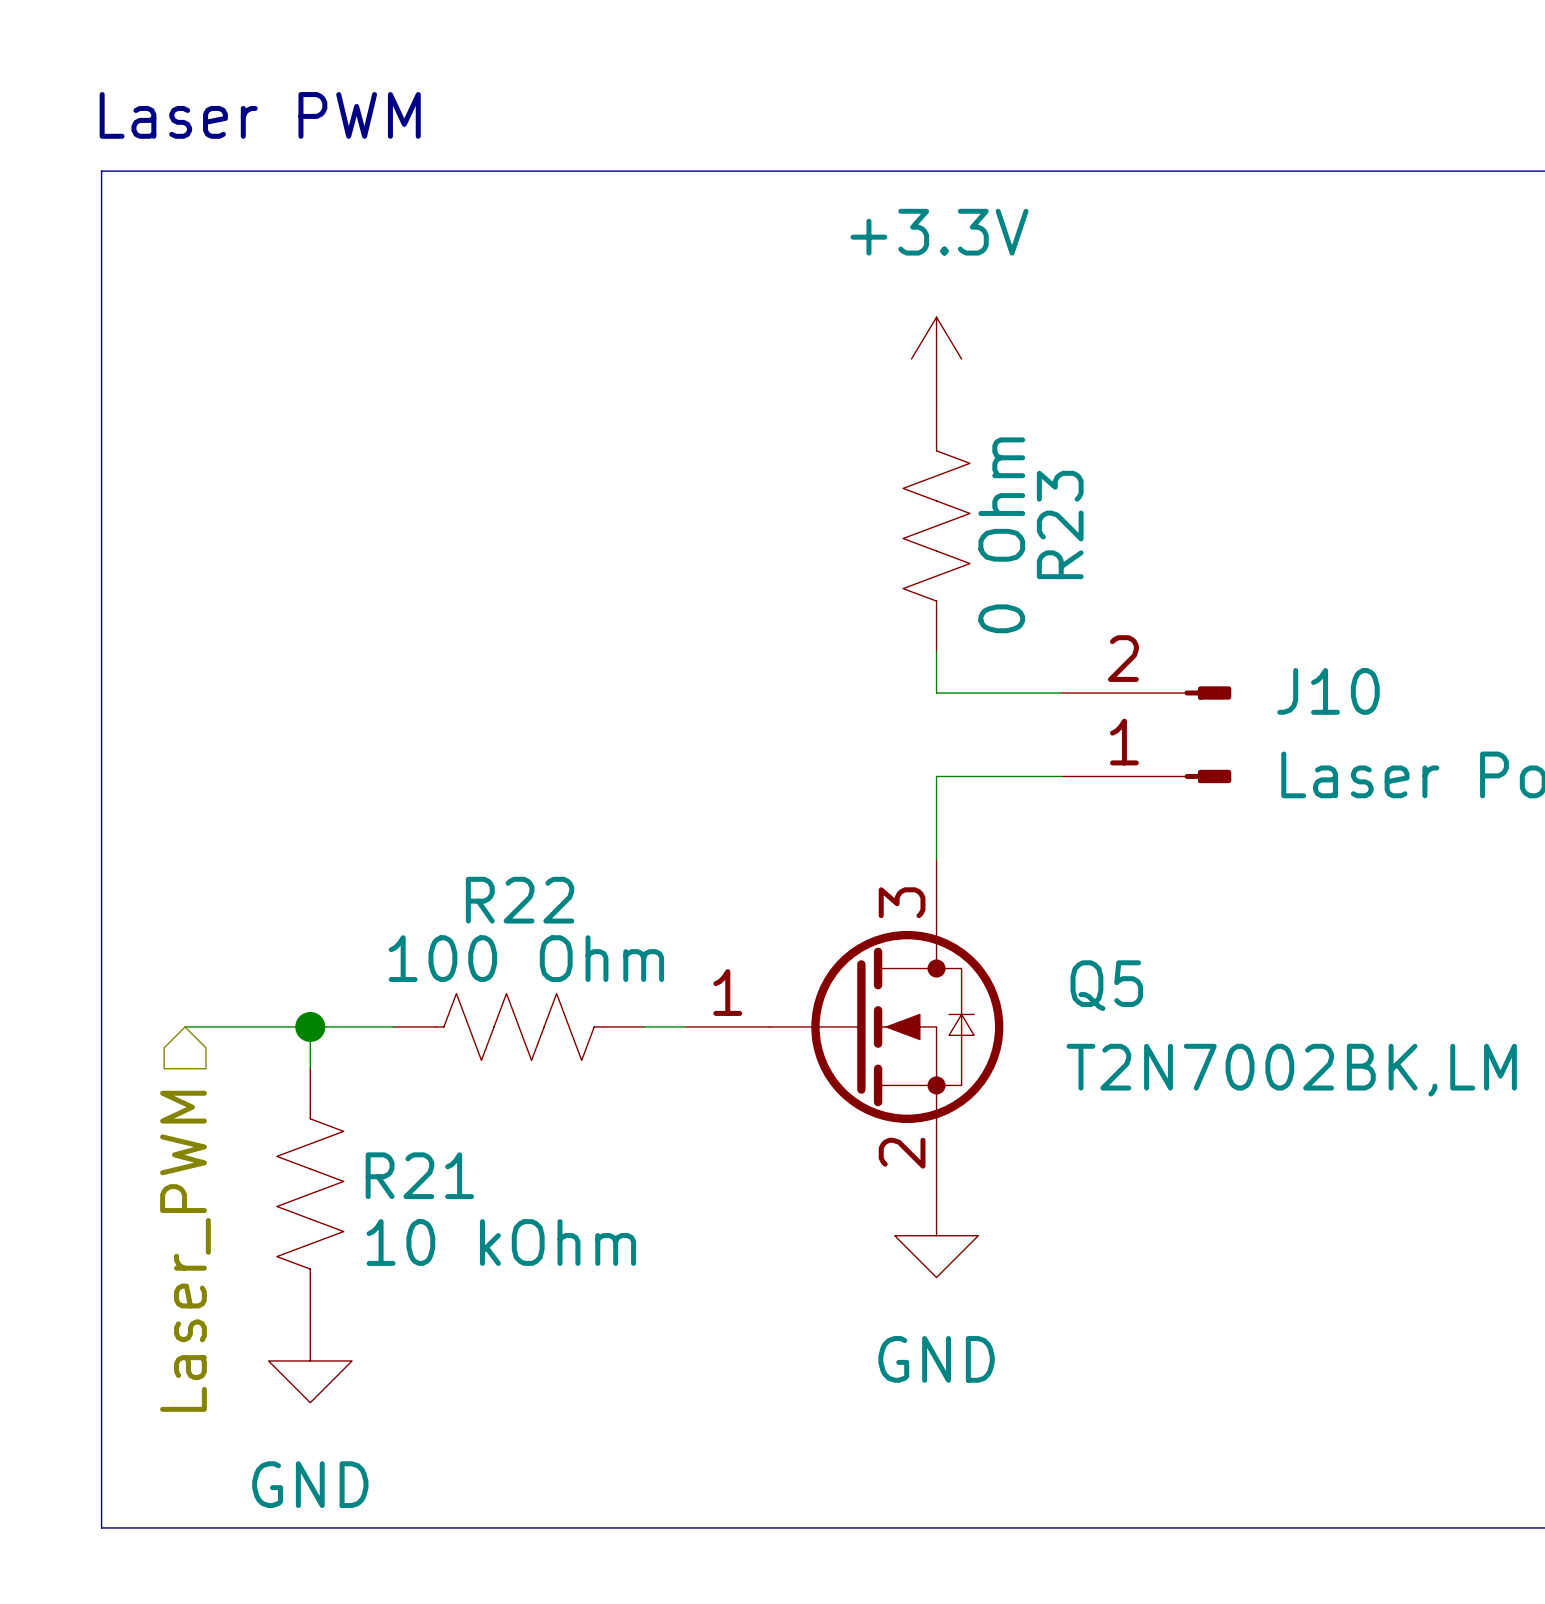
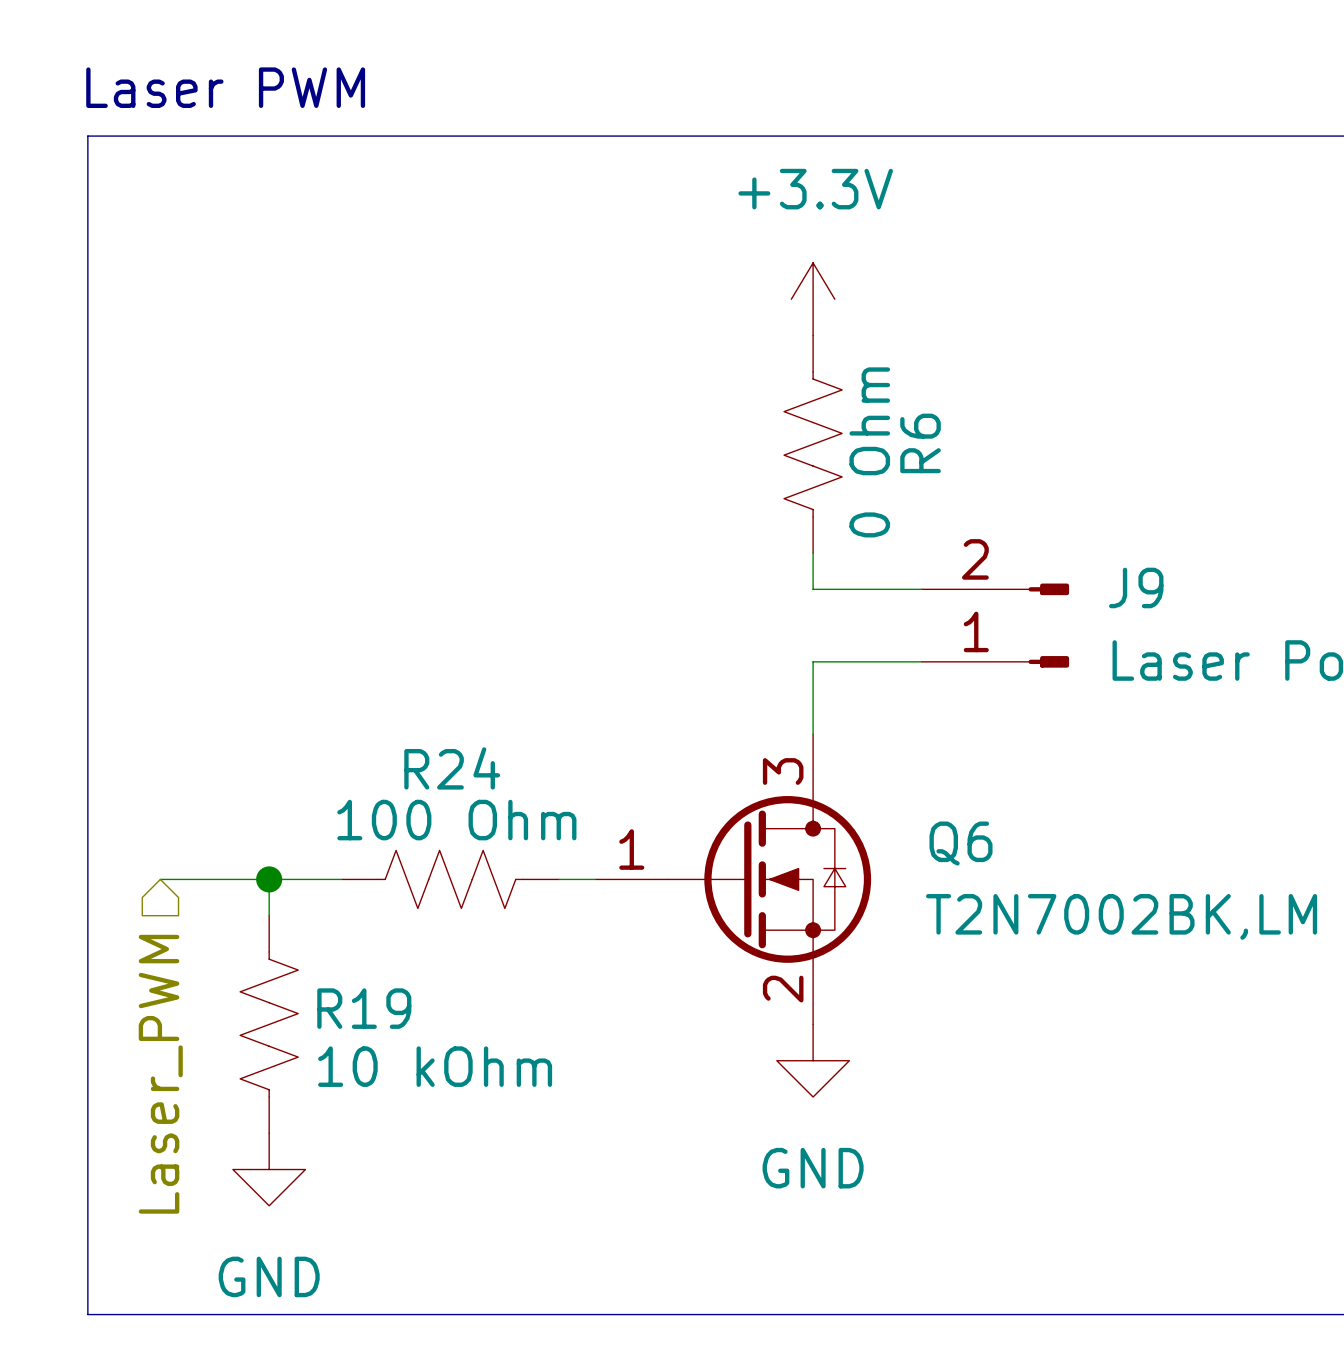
R23 name: R23 (1060, 524) -> R6 (920, 443)
J10 name: J10 (1328, 691) -> J9 (1136, 587)
R22 name: R22 (520, 900) -> R24 (452, 768)
Q5 name: Q5 (1106, 985) -> Q6 (961, 843)
R21 name: R21 (419, 1175) -> R19 (364, 1008)

